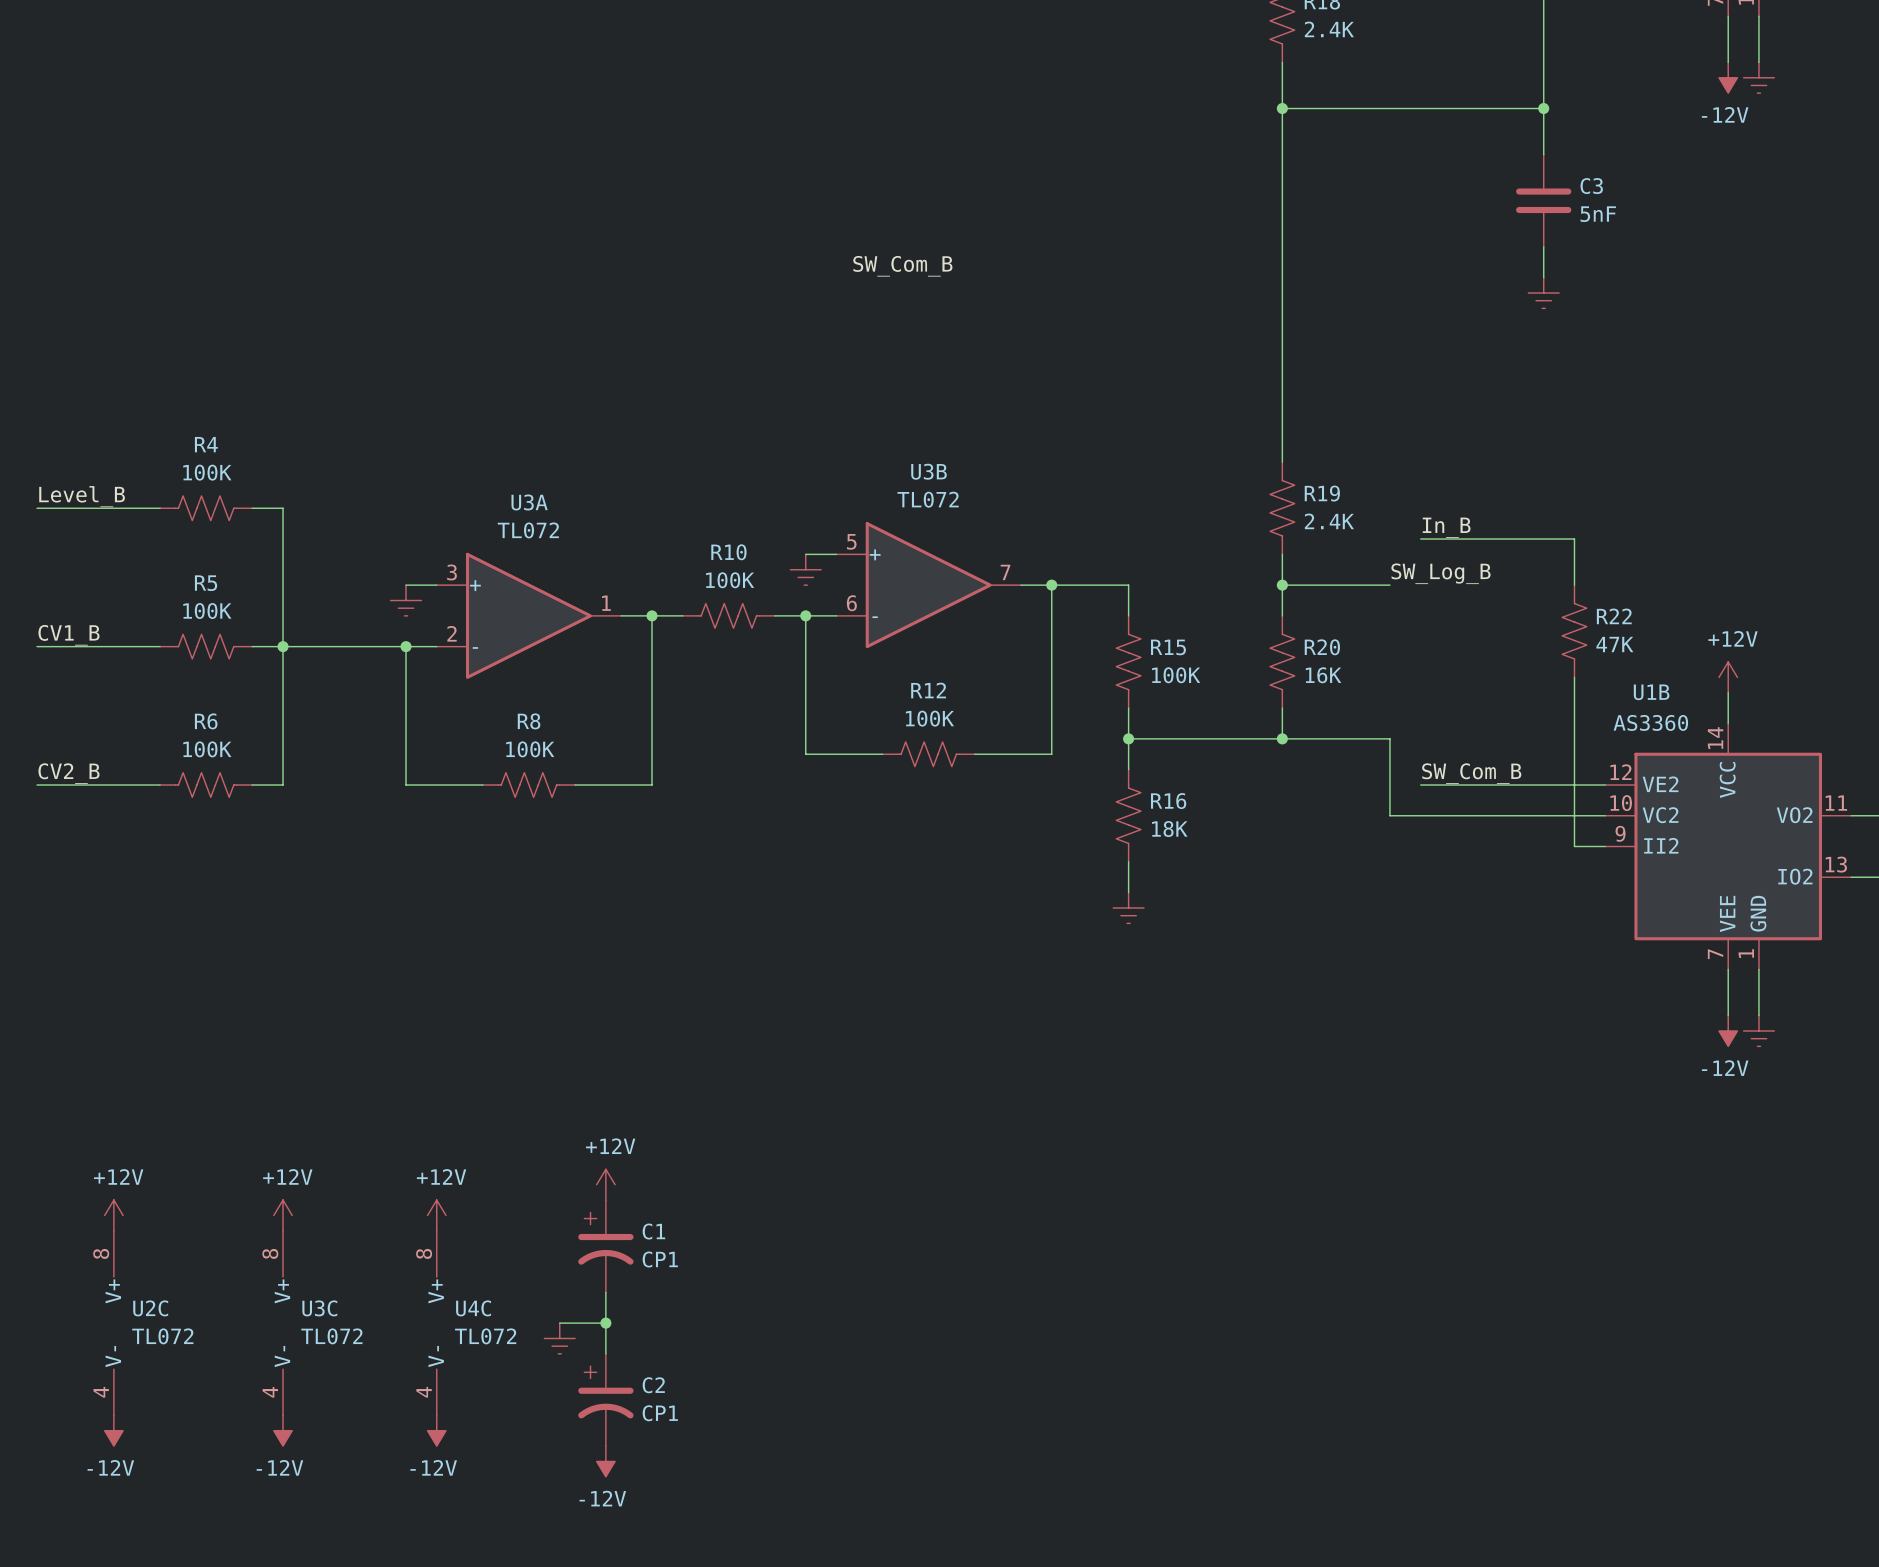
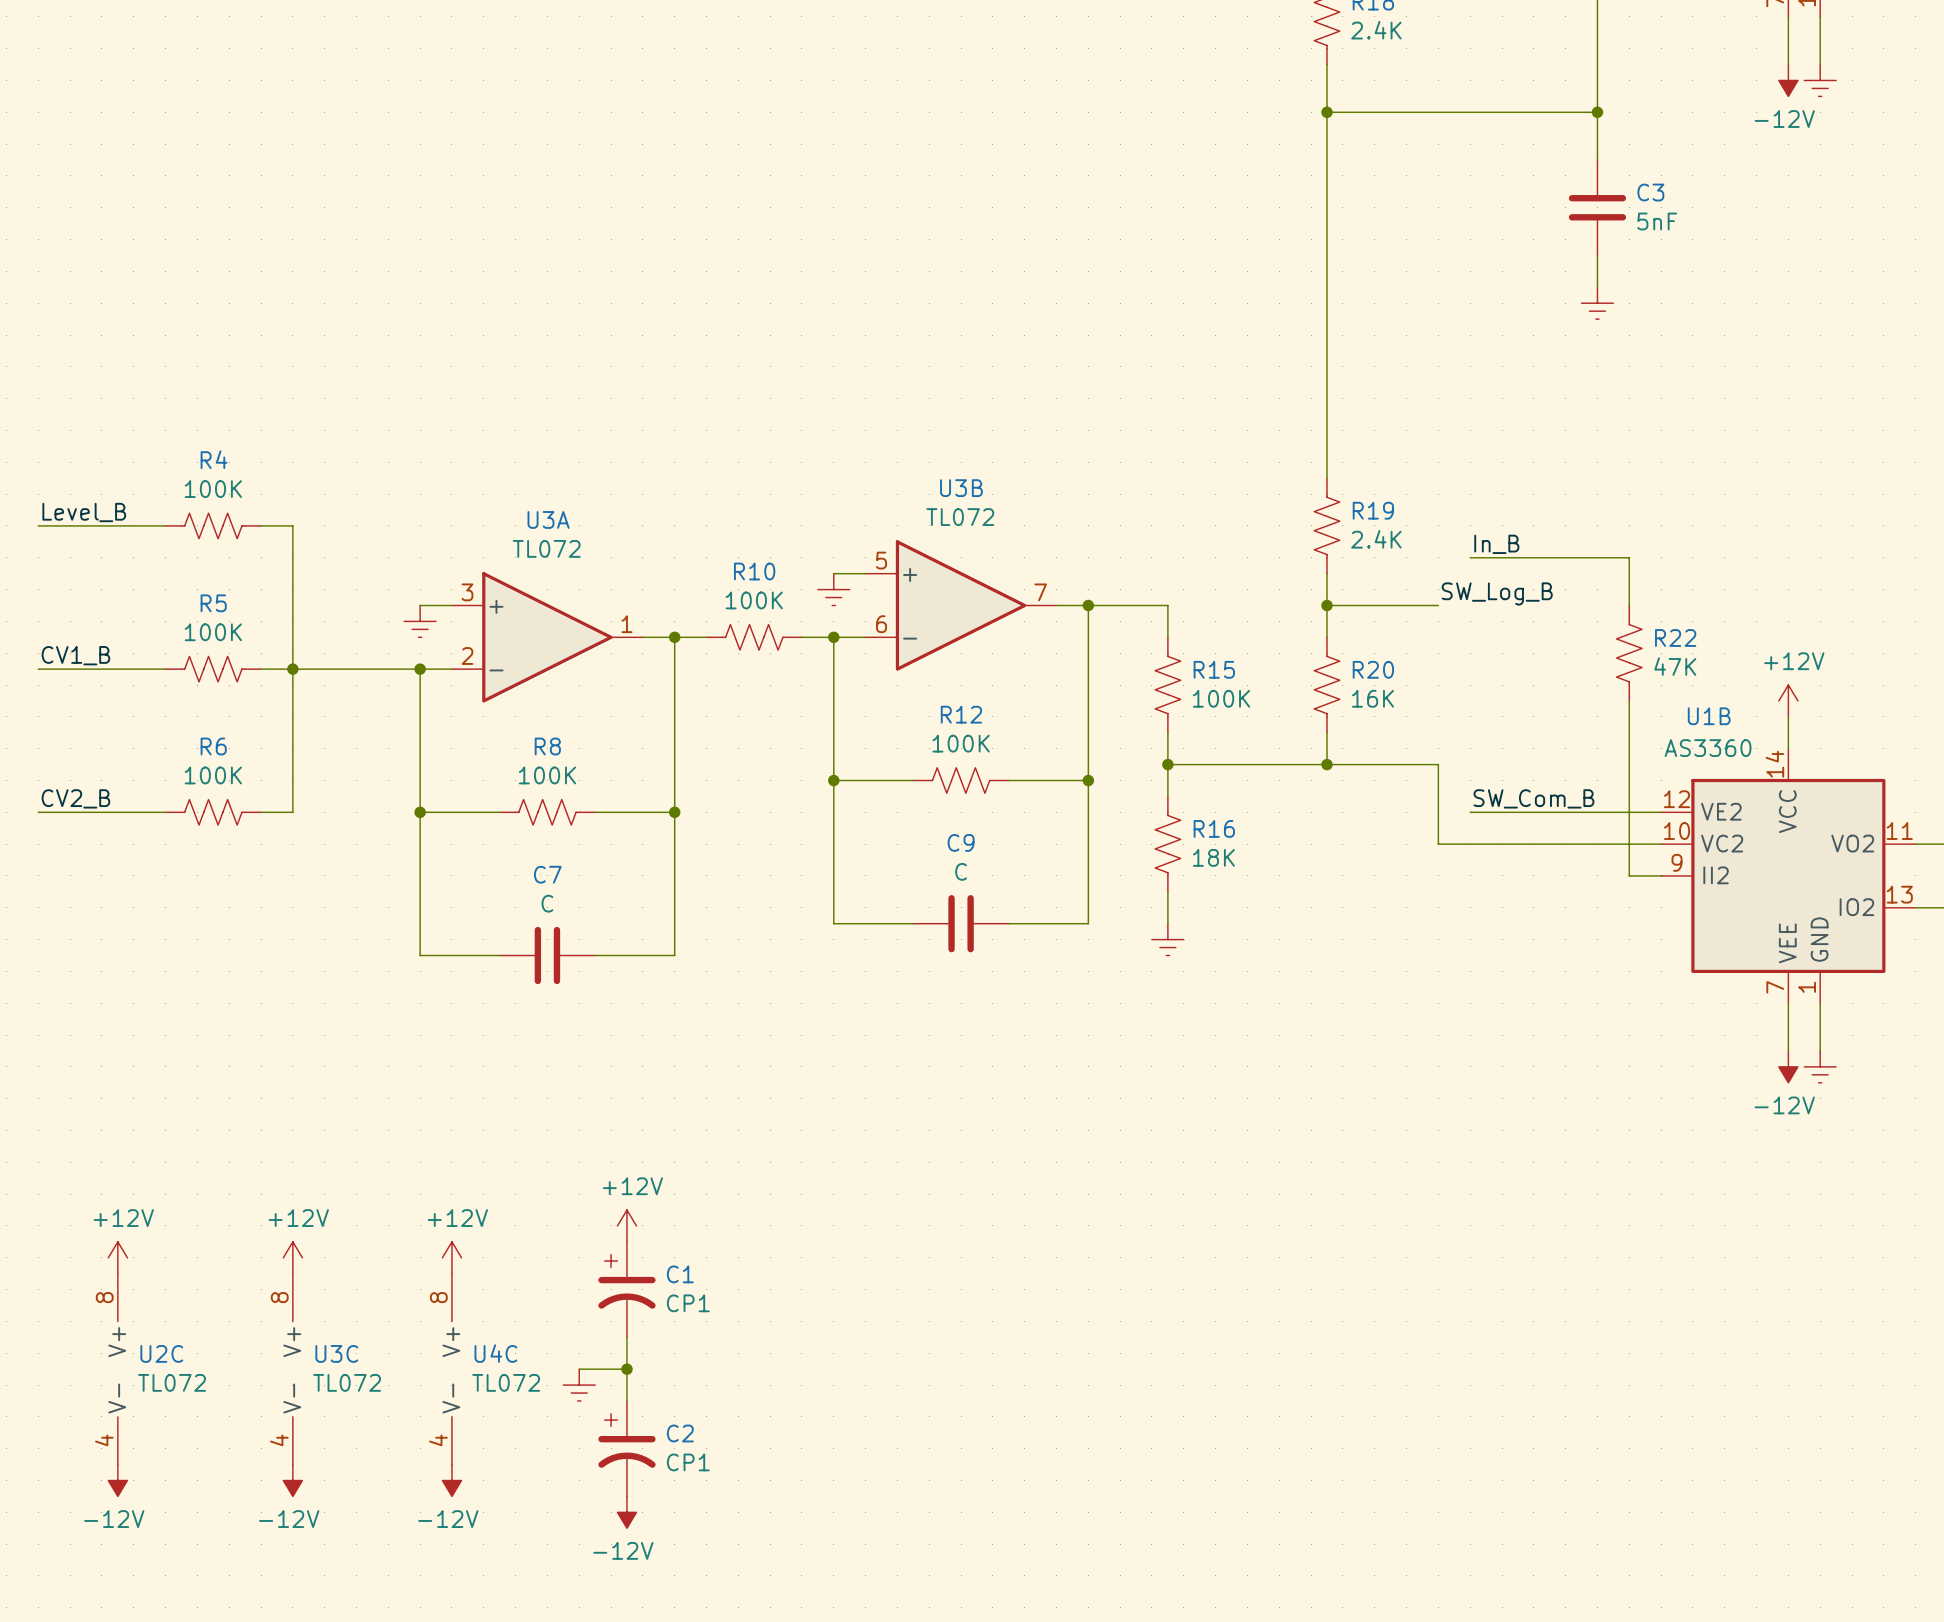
label: SW_Com_B (902, 266) -> none
wire: none -> (833, 780) (833, 923) (913, 923)
junction: none -> (833, 780)
wire: none -> (1088, 780) (1088, 923) (1008, 923)
junction: none -> (1088, 780)
wire: none -> (420, 812) (420, 955) (499, 955)
junction: none -> (420, 812)
wire: none -> (674, 812) (674, 955) (595, 955)
junction: none -> (674, 812)
C9: none -> C (961, 923)
C7: none -> C (547, 955)

